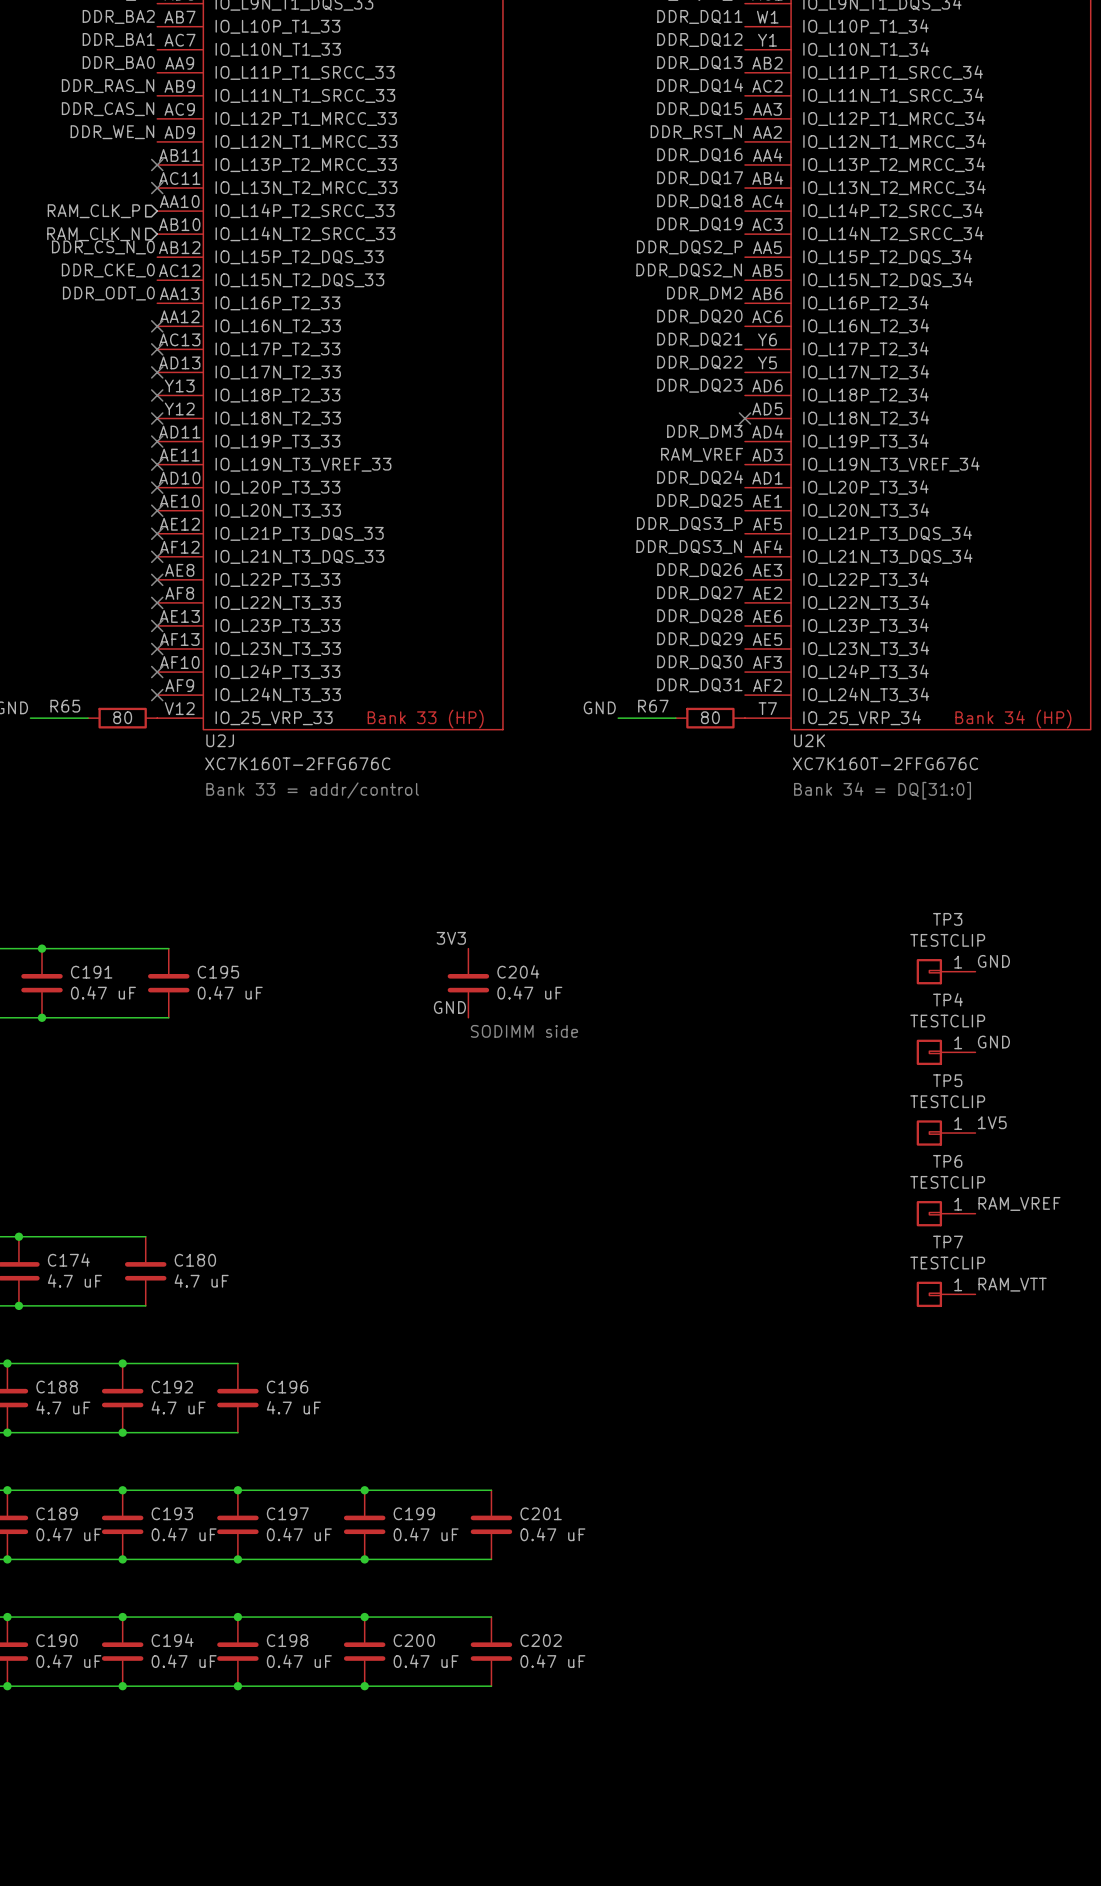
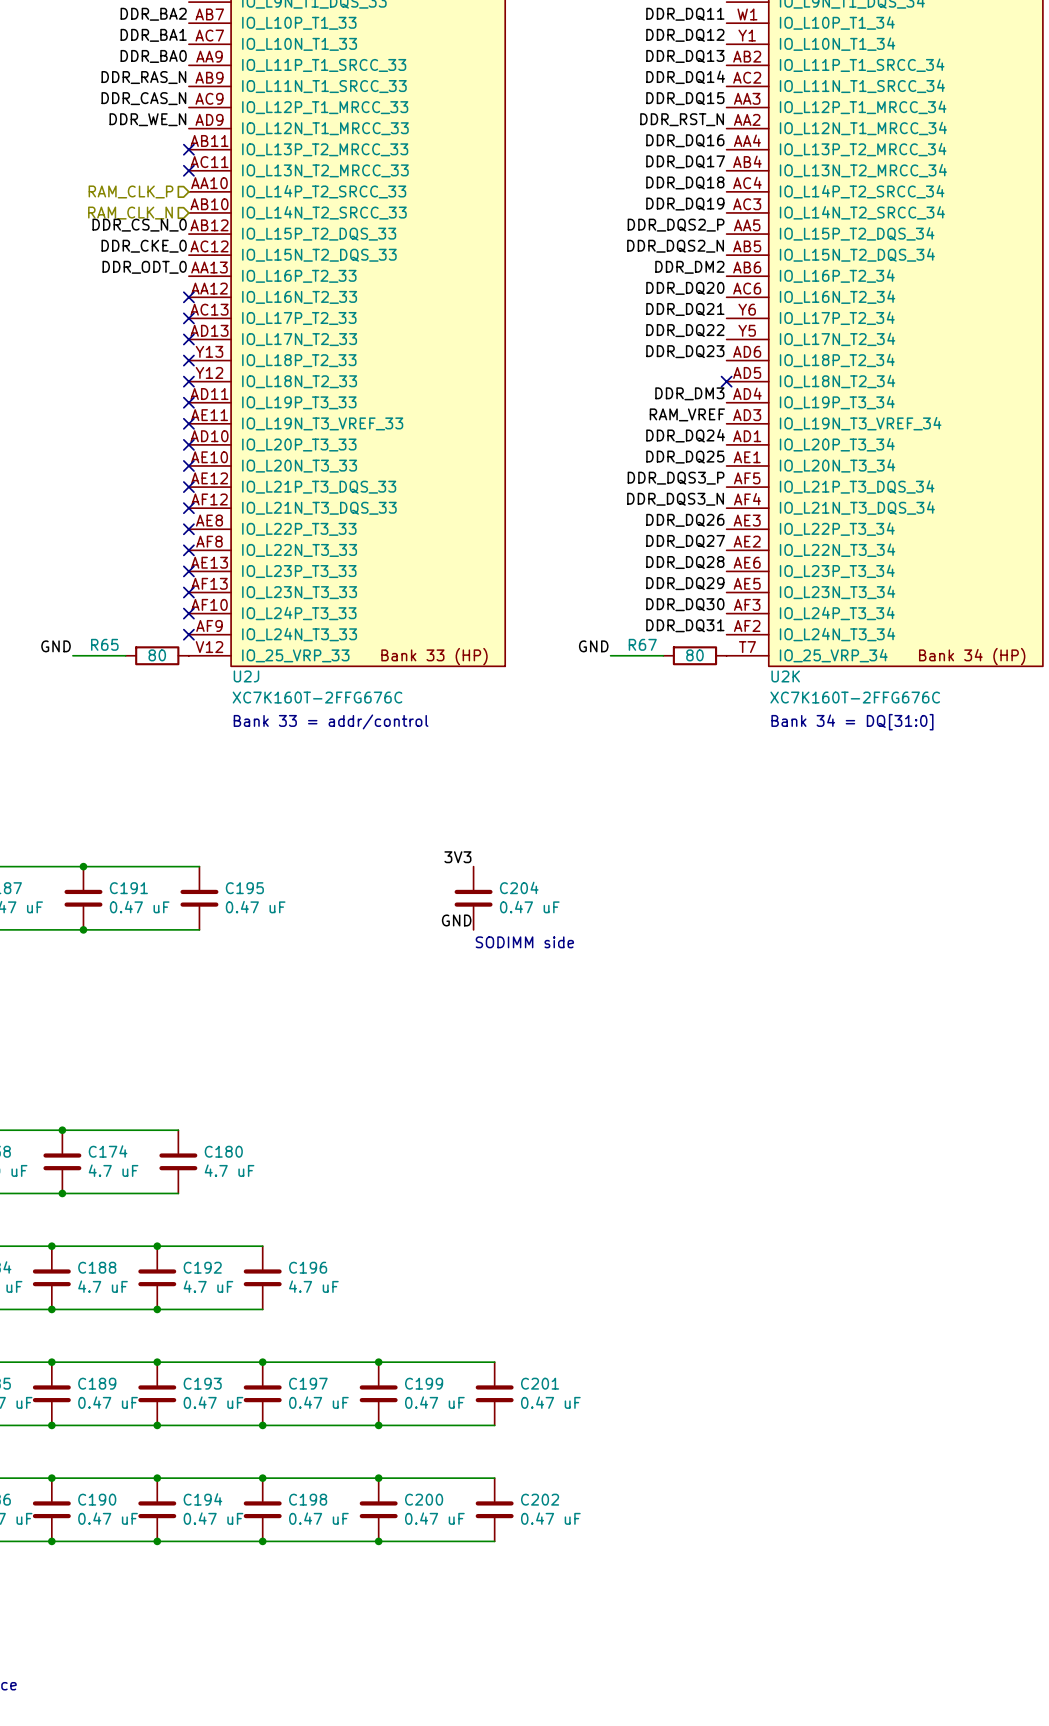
label: GND (993, 961) -> none
TP3: TESTCLIP (946, 971) -> none
label: GND (993, 1042) -> none
TP4: TESTCLIP (946, 1052) -> none
label: 1V5 (992, 1122) -> none
TP5: TESTCLIP (946, 1133) -> none
label: RAM_VREF (1019, 1203) -> none
TP6: TESTCLIP (946, 1213) -> none
label: RAM_VTT (1012, 1284) -> none
TP7: TESTCLIP (946, 1294) -> none

